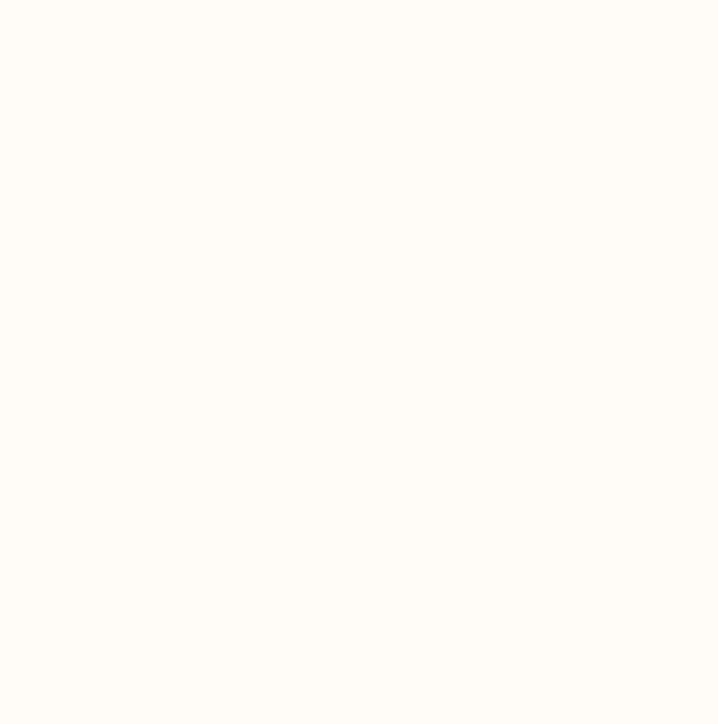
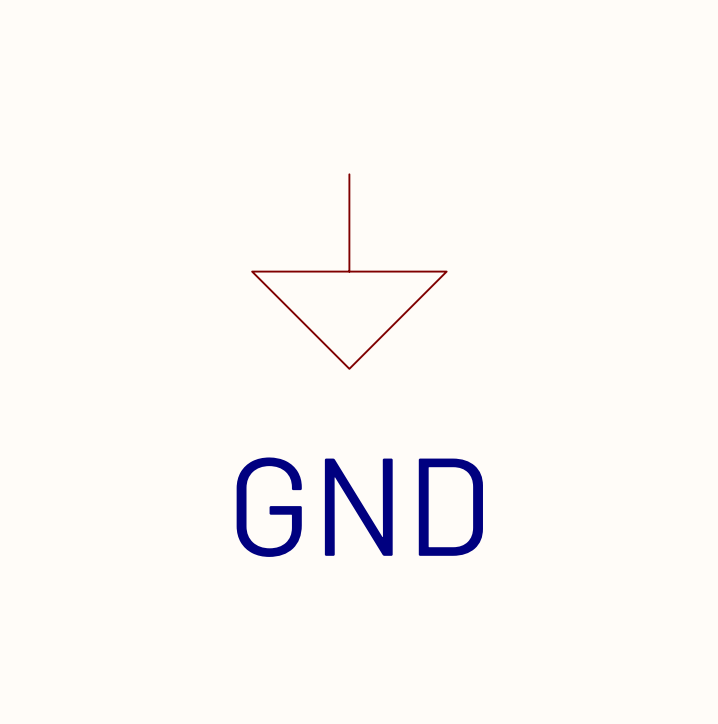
power symbol: none -> GND (349, 271)

